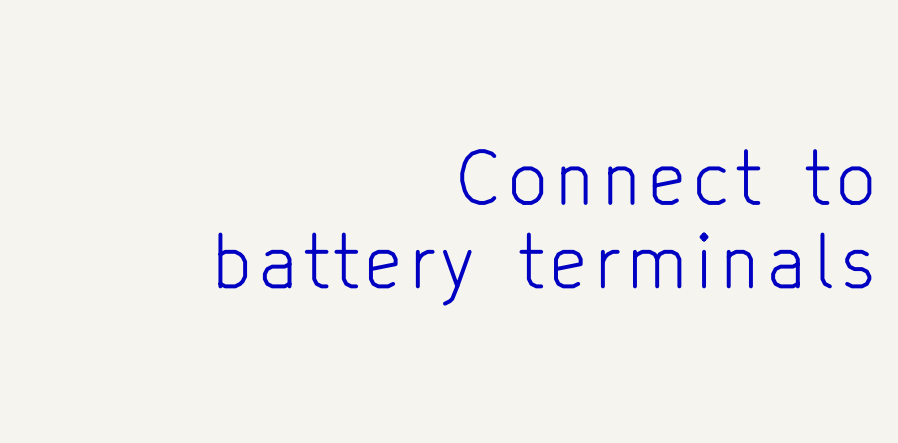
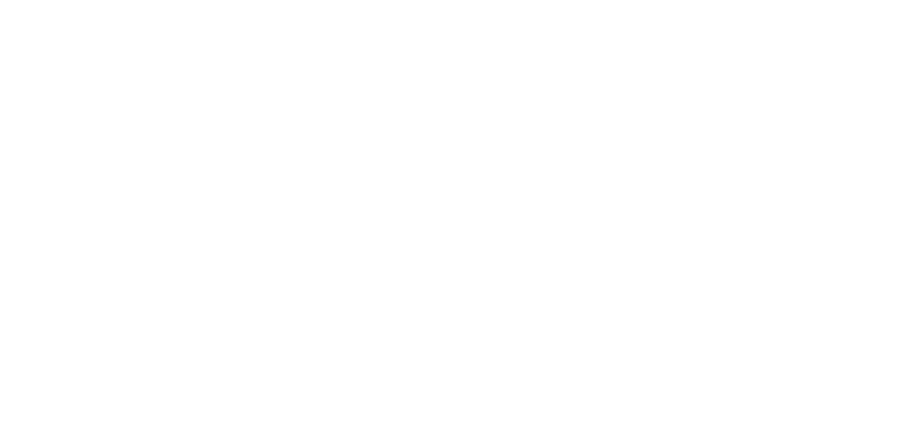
text: Connect to (665, 177) -> none
text: battery terminals (544, 269) -> none

